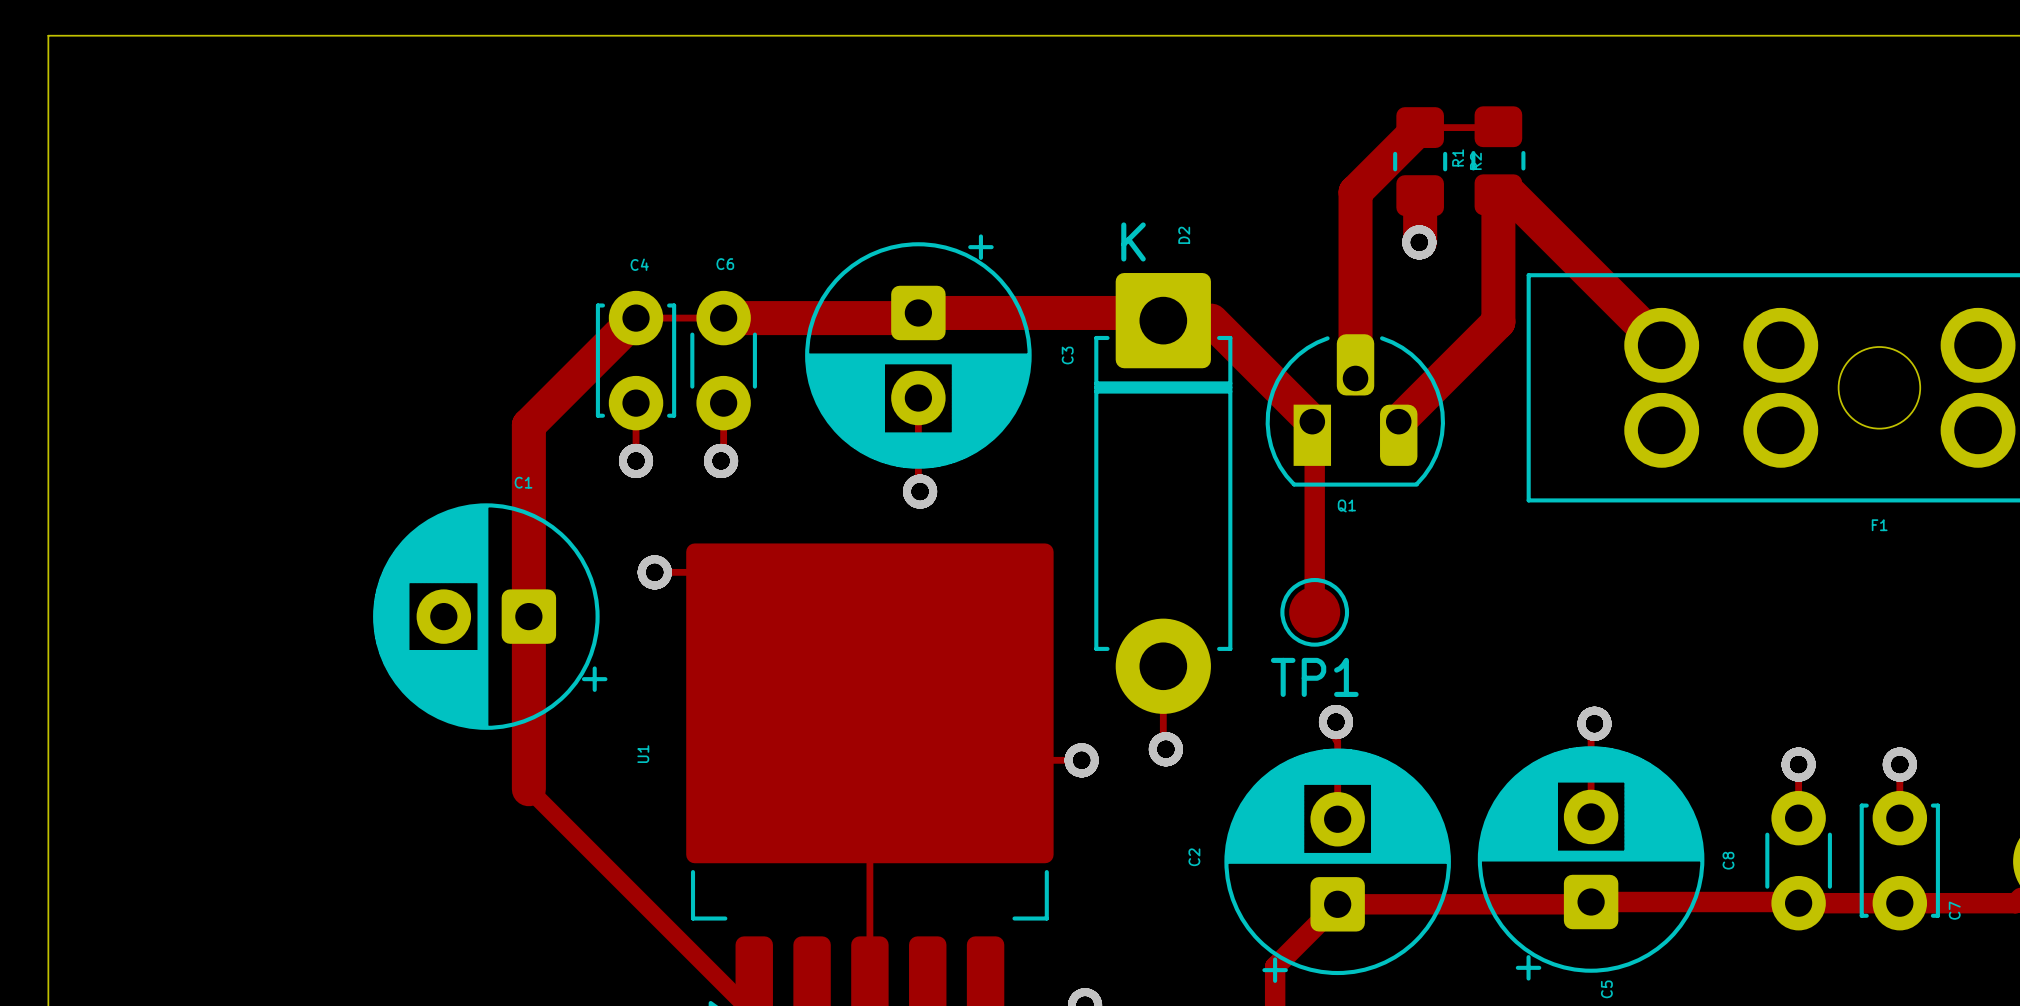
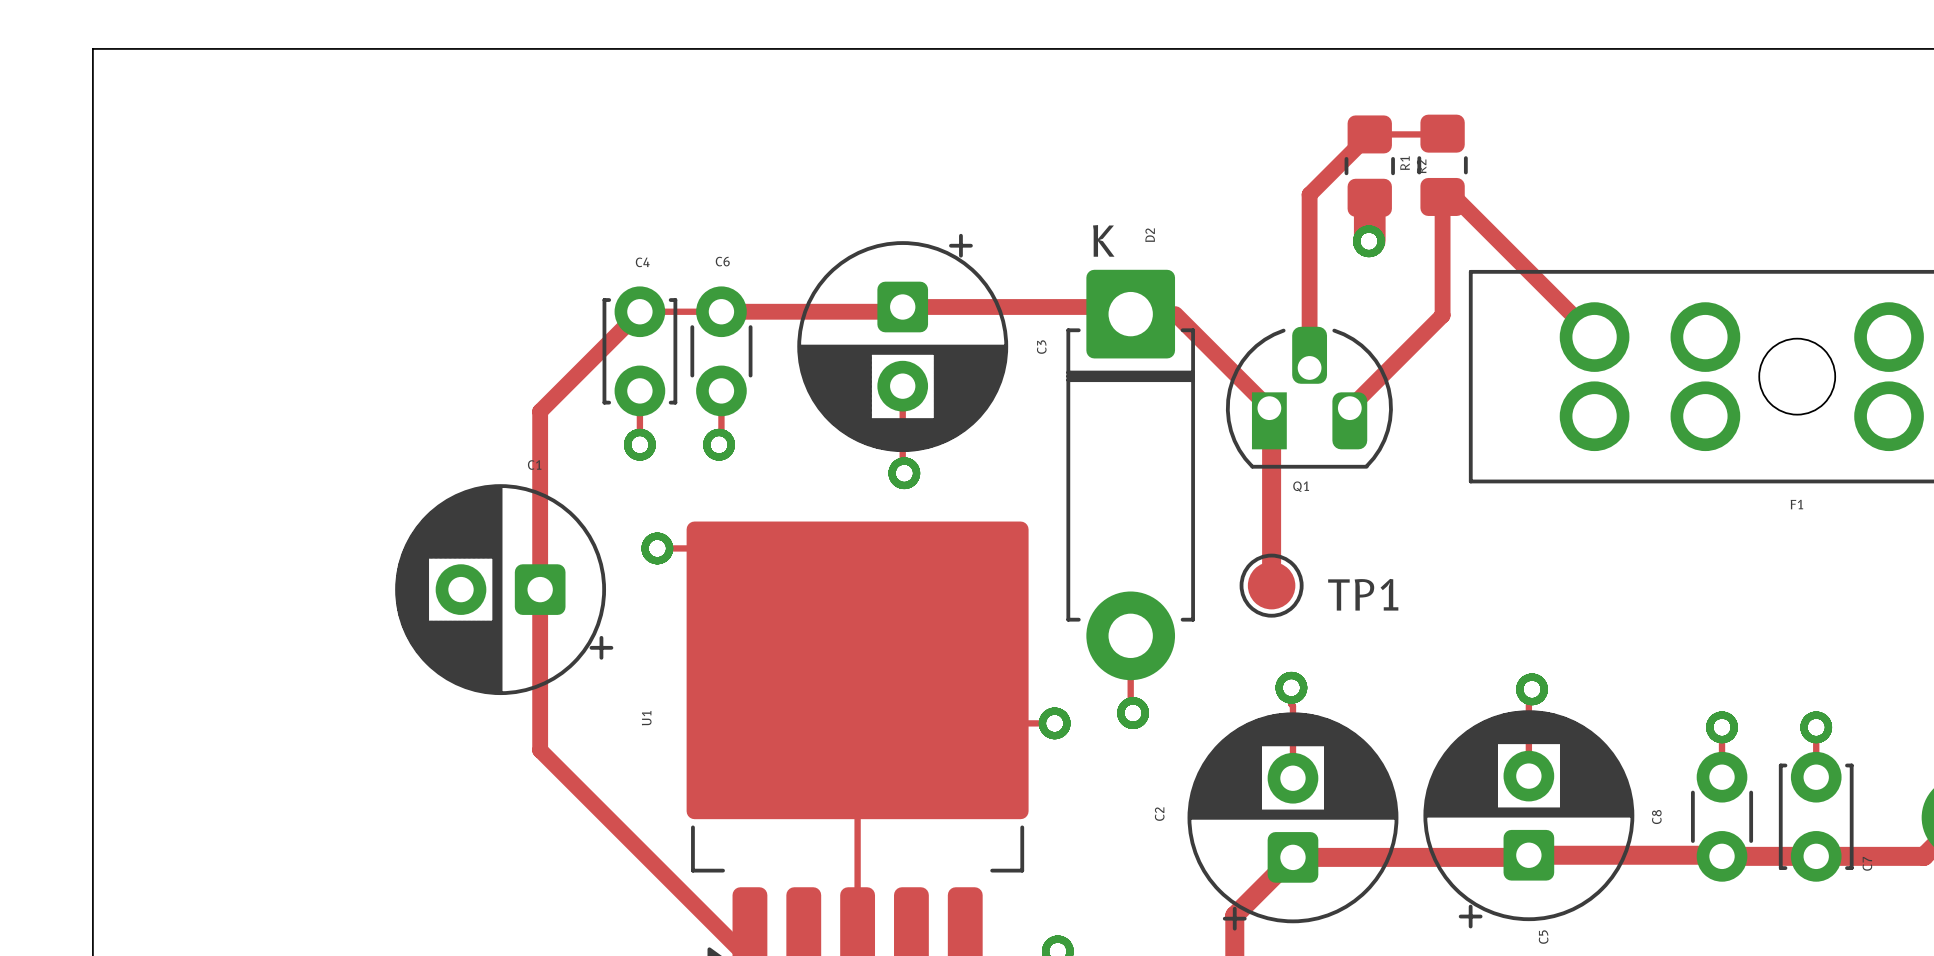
track width: thick (1420, 127) (1355, 192) (1355, 378) -> thin (1369, 134) (1309, 194) (1309, 367)
track width: thick (1498, 194) (1498, 321) (1398, 421) -> thin (1442, 196) (1442, 315) (1349, 408)
track width: thick (1511, 194) (1661, 345) -> thin (1454, 196) (1594, 337)
track width: thick (918, 312) (1155, 312) -> thin (902, 307) (1123, 307)
track width: thick (636, 318) (528, 425) (528, 789) -> thin (639, 311) (540, 411) (540, 750)
track width: thick (723, 318) (913, 318) -> thin (721, 311) (897, 311)
track width: thick (1211, 320) (1312, 421) -> thin (1175, 314) (1269, 408)
TP1 name position: TP1 (1314, 677) -> TP1 (1363, 594)

